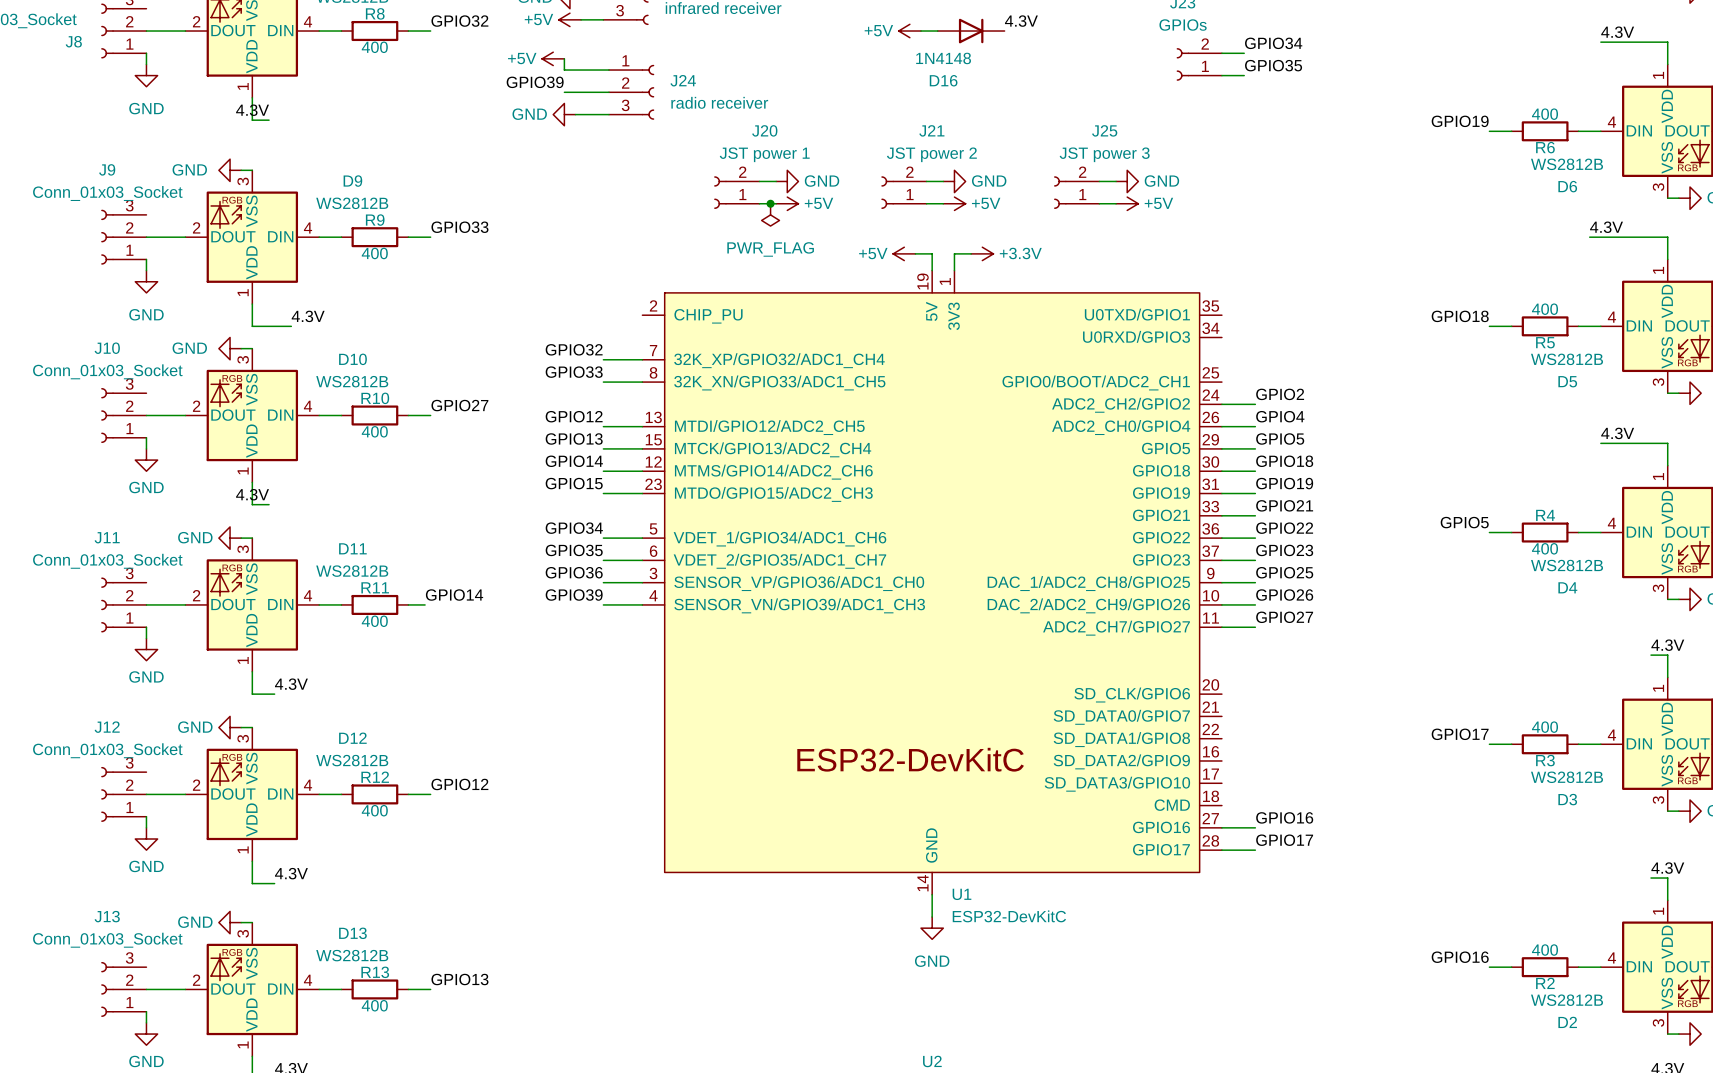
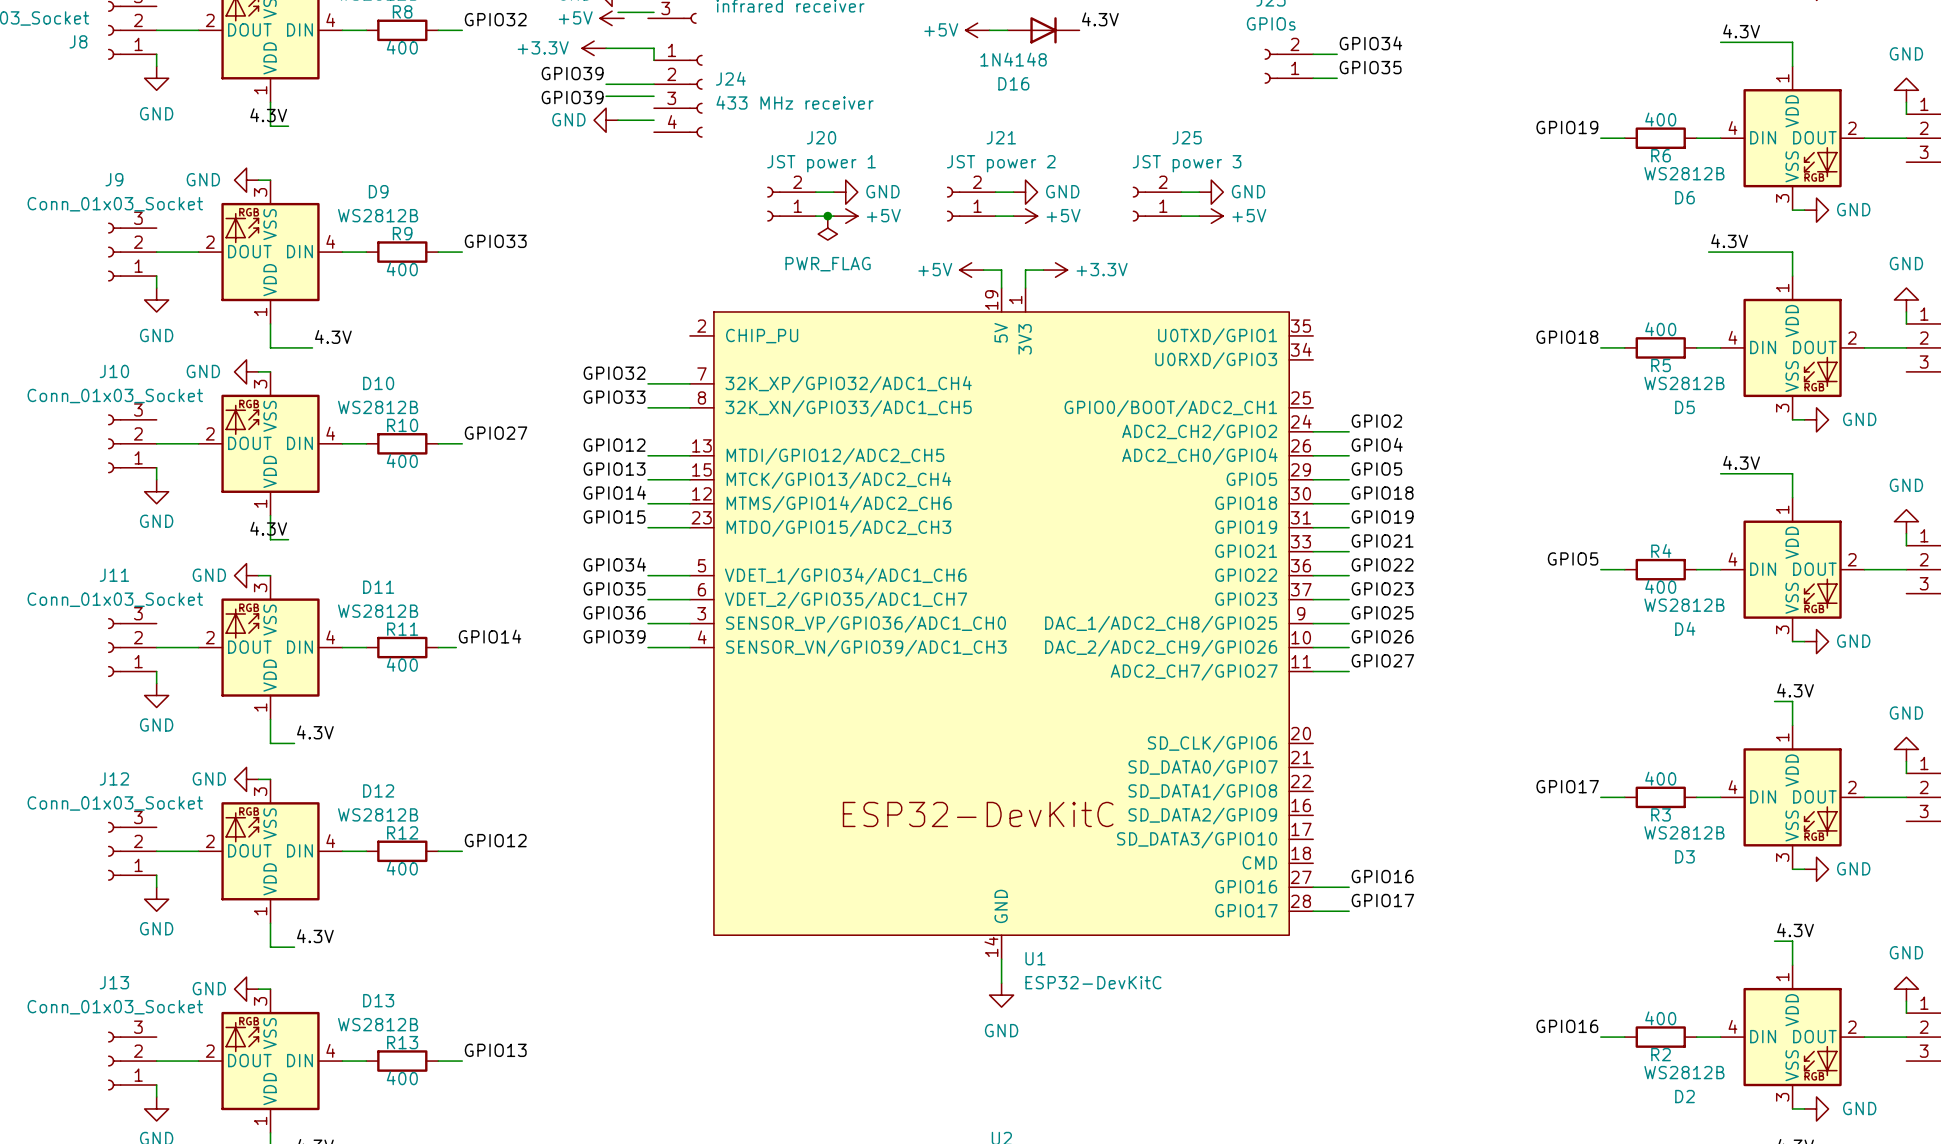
wire: none -> (618, 12) (654, 12)
wire: (581, 19) (603, 19) -> none
power symbol: none -> +3.3V (594, 48)
wire: none -> (606, 48) (654, 48) (654, 60)
power symbol: +5V (553, 58) -> none
wire: (564, 58) (564, 70) (608, 70) -> none
J24 symbol: [608, 64, 655, 120] -> [654, 54, 703, 138]
label: none -> GPIO39 (572, 73)
wire: none -> (606, 84) (654, 84)
label: GPIO39 (535, 82) -> none
label: none -> GPIO39 (572, 97)
J24 value: radio receiver (719, 102) -> 433 MHz receiver (795, 102)

